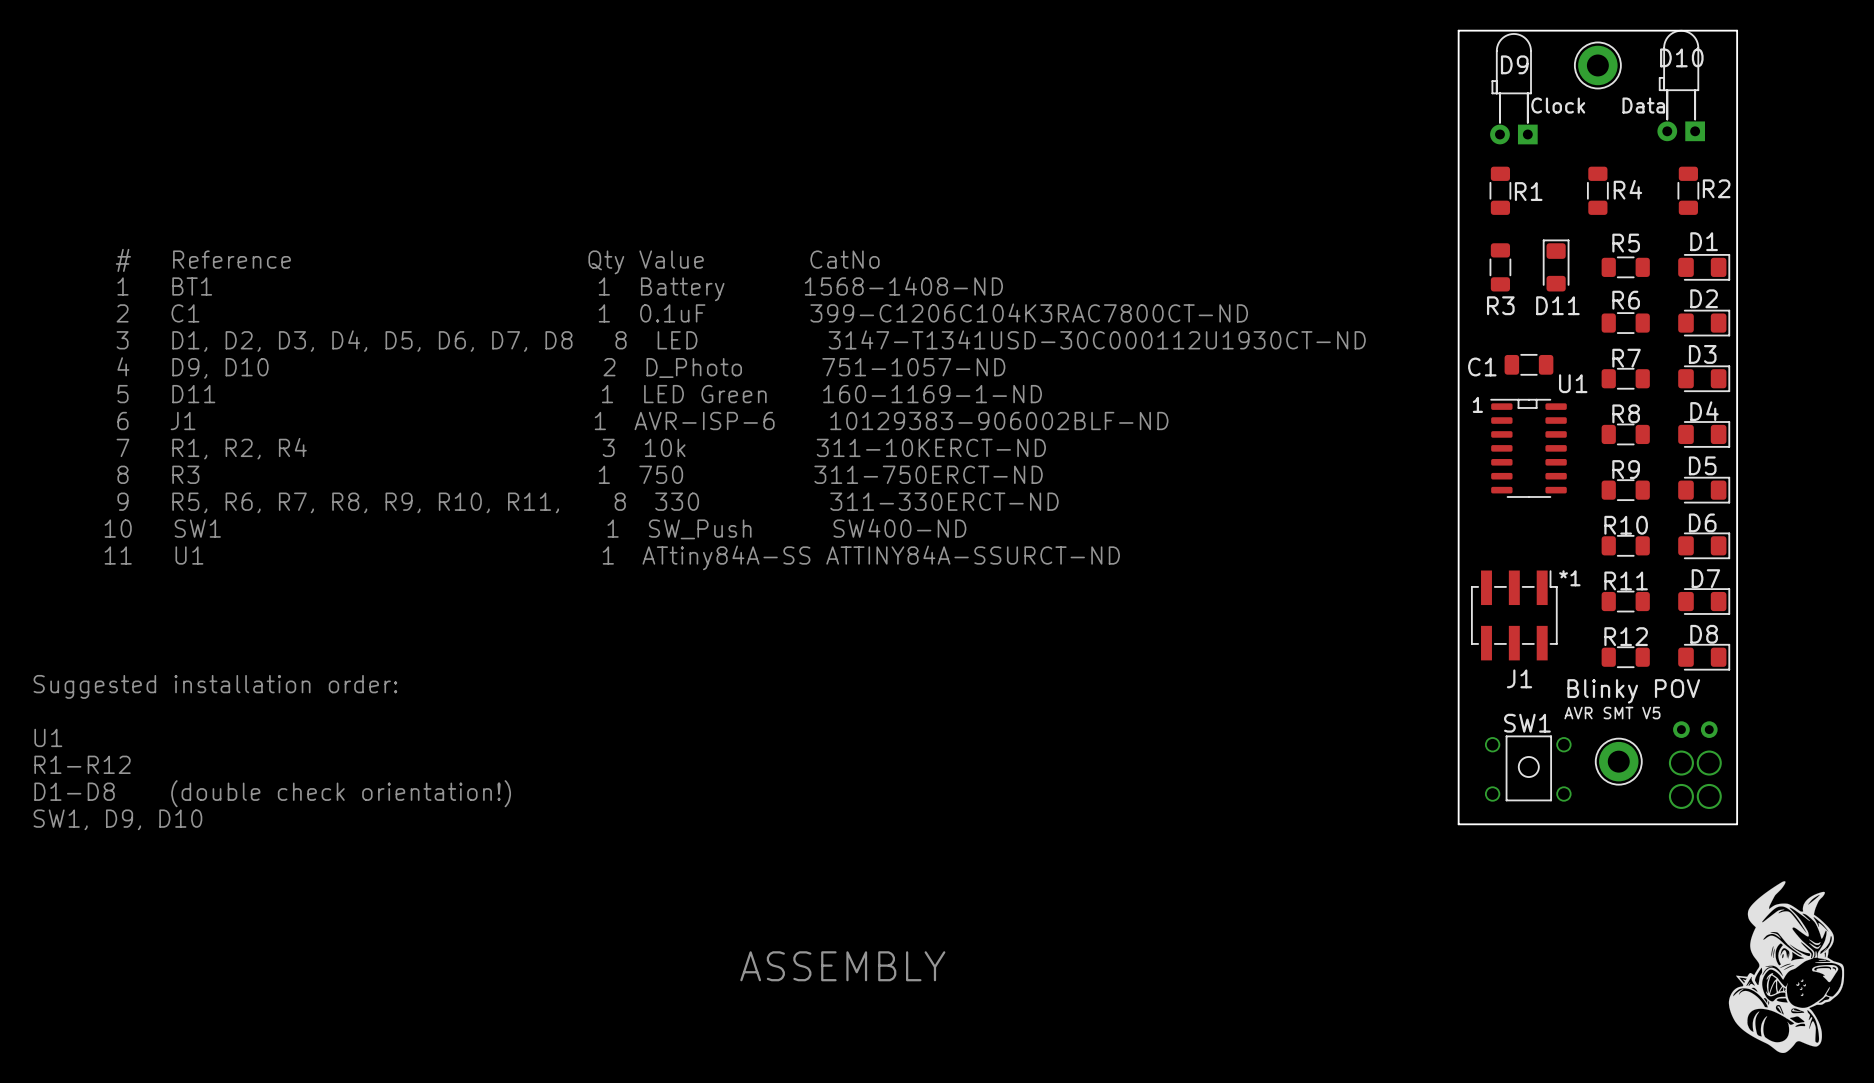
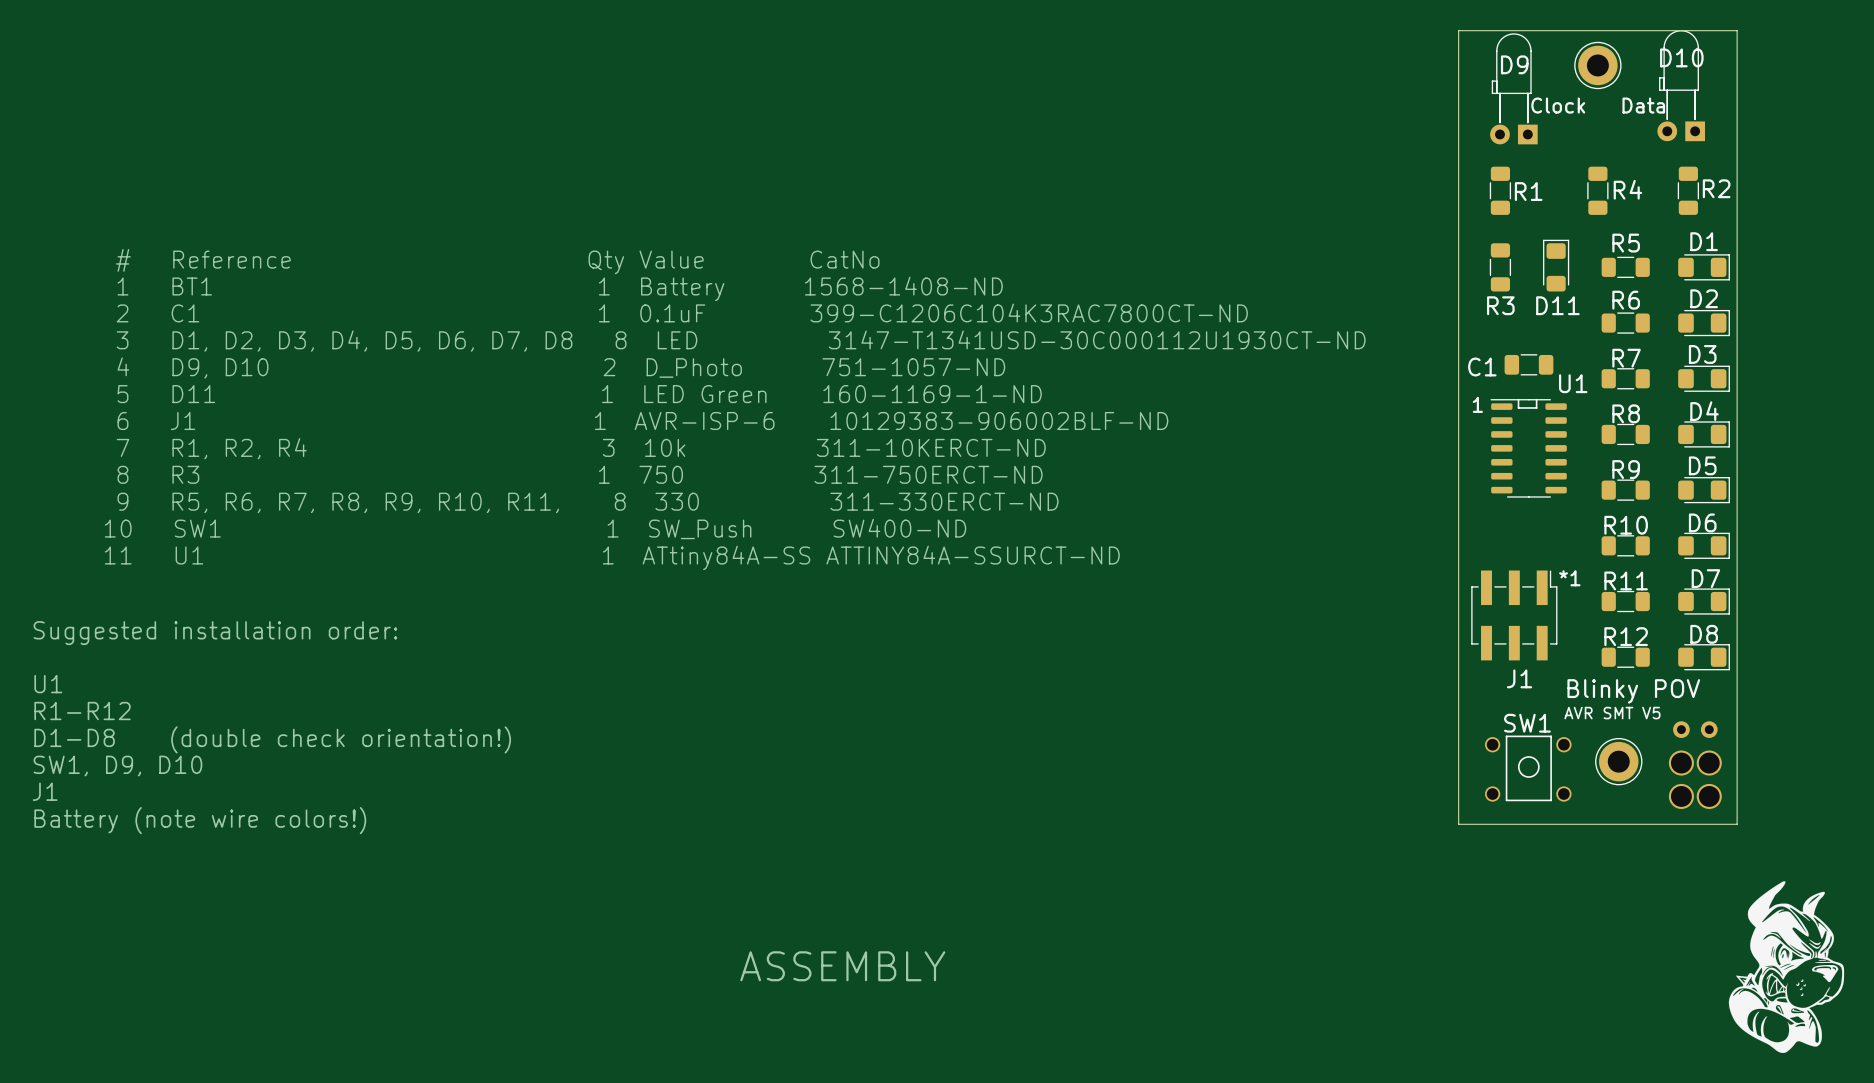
text: none -> Suggested installation order: (215, 633)
text: Suggested installation order: (215, 686) -> U1 (48, 684)
text: none -> R1-R12 (82, 711)
text: U1 (48, 737) -> D1-D8 (double check orientation!) (272, 739)
text: R1-R12 (82, 764) -> SW1, D9, D10 (117, 766)
text: D1-D8 (double check orientation!) (272, 793) -> J1 (45, 791)
text: SW1, D9, D10 (117, 819) -> Battery (note wire colors!) (200, 820)

